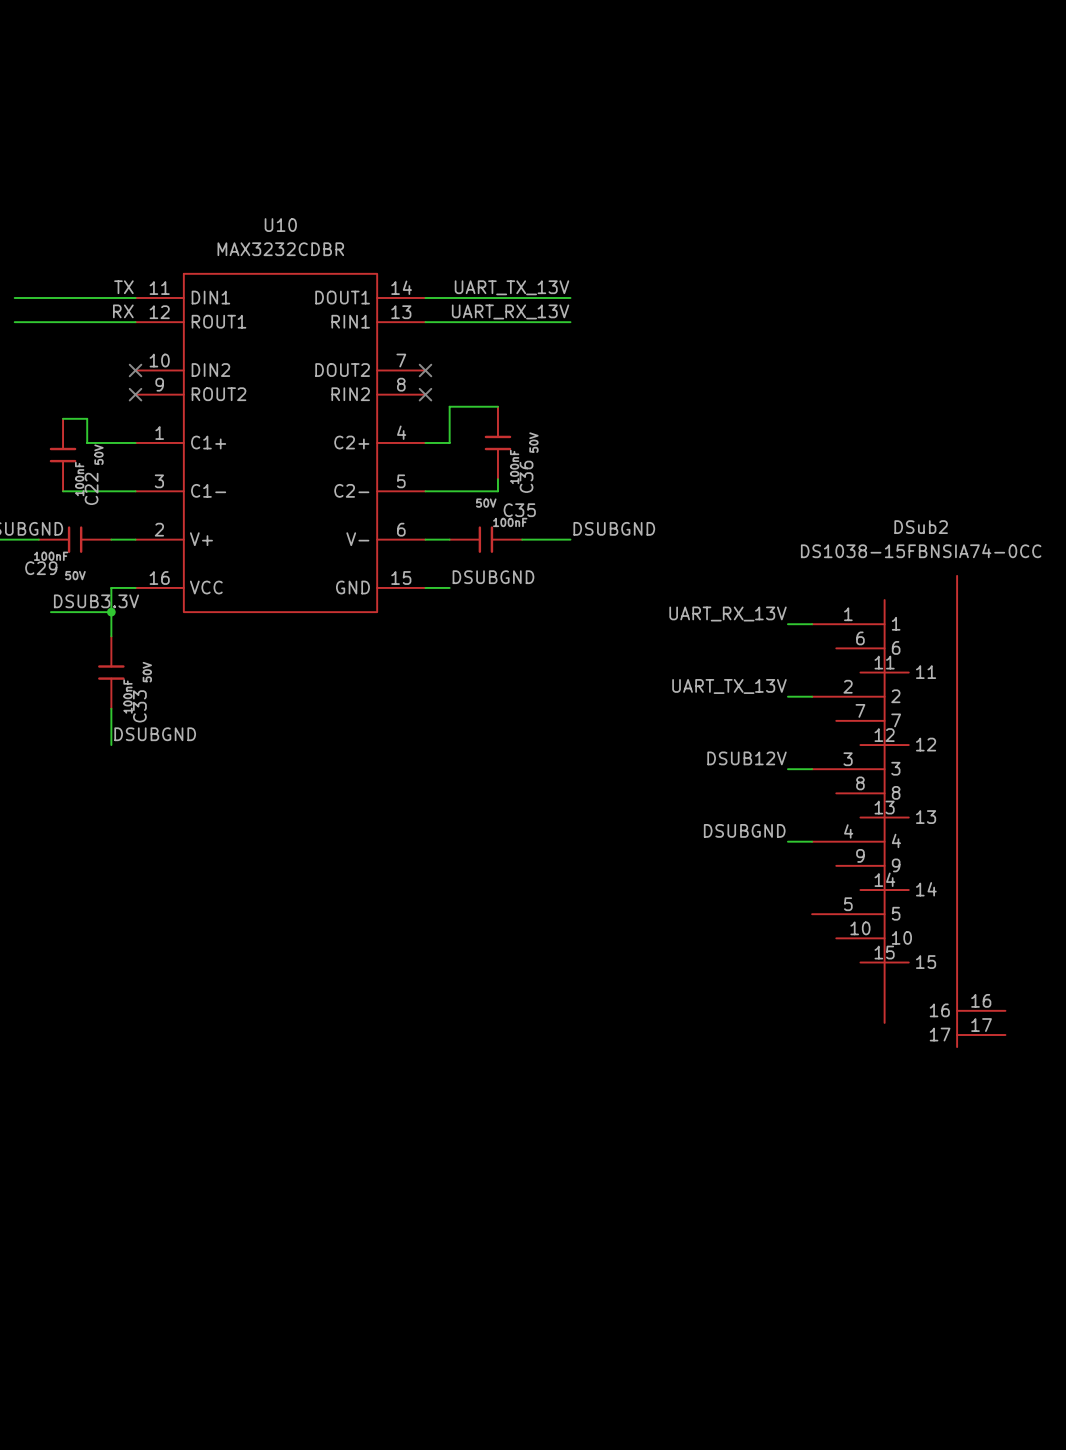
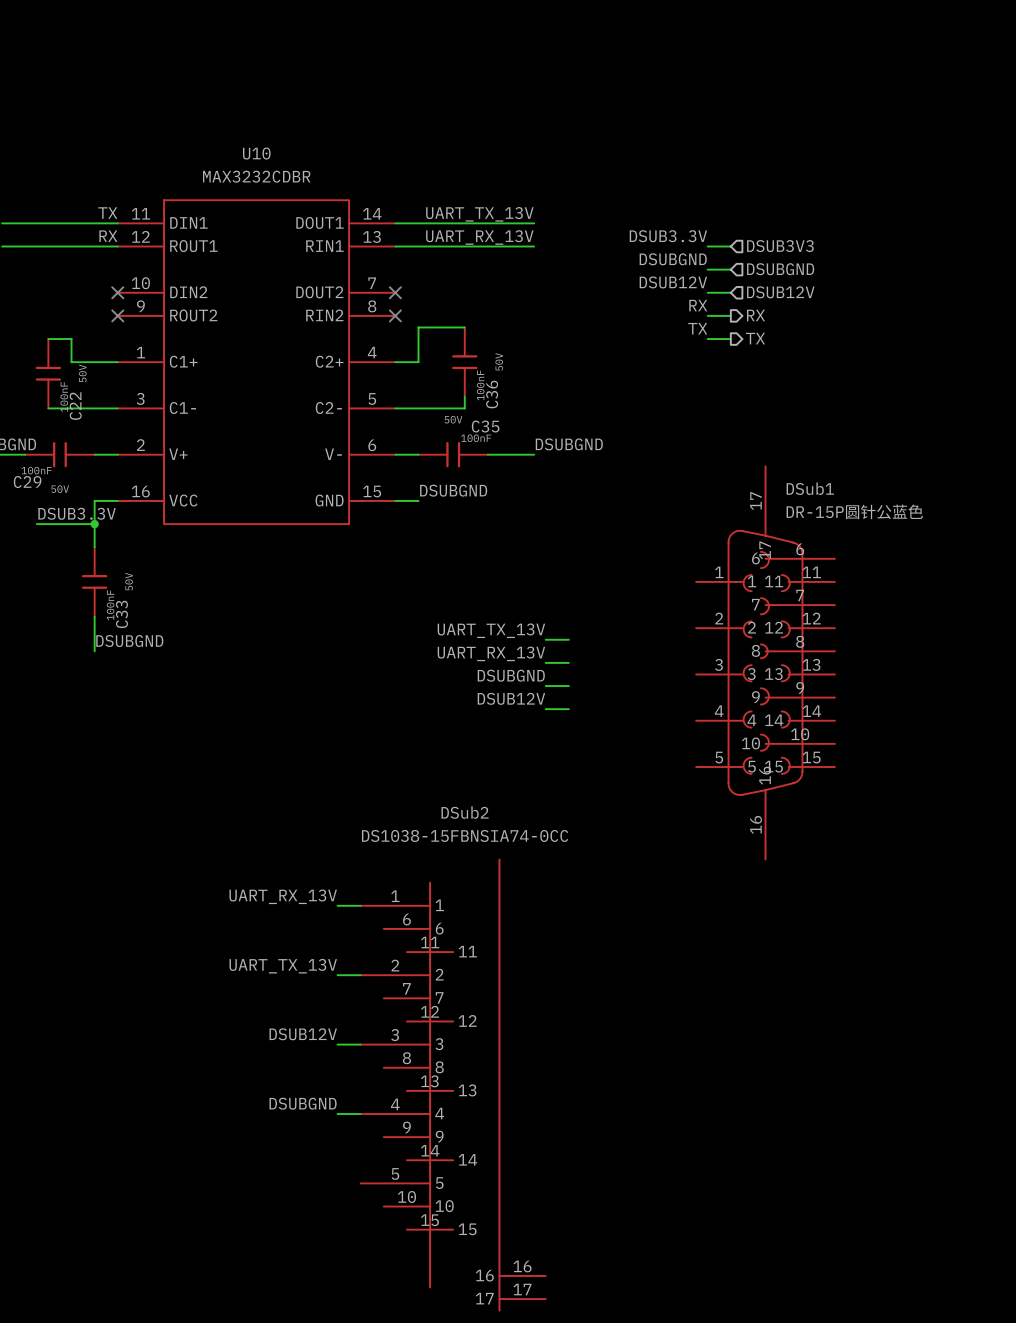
label: none -> DSUB3.3V (668, 236)
hierarchical label: none -> DSUB3V3 (780, 246)
wire: none -> (707, 246) (730, 246)
label: none -> DSUBGND (673, 259)
hierarchical label: none -> DSUBGND (780, 269)
wire: none -> (707, 269) (730, 269)
label: none -> DSUB12V (673, 282)
wire: none -> (707, 292) (730, 292)
hierarchical label: none -> DSUB12V (780, 292)
label: none -> RX (698, 305)
wire: none -> (707, 315) (730, 315)
hierarchical label: none -> RX (755, 315)
label: none -> TX (697, 328)
hierarchical label: none -> TX (755, 338)
label: UART_RX_13V (728, 614) -> none
wire: (787, 624) (812, 624) -> (707, 339) (730, 339)
label position: UART_TX_13V (729, 686) -> UART_TX_13V (491, 630)
wire: (787, 696) (812, 696) -> (545, 639) (568, 639)
label: none -> UART_RX_13V (491, 653)
wire: none -> (545, 662) (568, 662)
DSub1: none -> DR-15P圆针公蓝色 (765, 662)
label: DSUB12V (747, 758) -> none
wire: (787, 769) (812, 769) -> (545, 709) (568, 709)
label: none -> DSUB12V (511, 698)
DSub2 position: (908, 811) -> (453, 1085)
label position: DSUBGND (744, 830) -> DSUBGND (511, 675)
wire: (787, 841) (812, 841) -> (545, 686) (568, 686)
label: none -> UART_RX_13V (283, 896)
wire: none -> (337, 905) (360, 905)
label: none -> UART_TX_13V (283, 966)
wire: none -> (337, 975) (360, 975)
label: none -> DSUB12V (303, 1034)
wire: none -> (337, 1044) (360, 1044)
label: none -> DSUBGND (303, 1103)
wire: none -> (337, 1114) (360, 1114)

